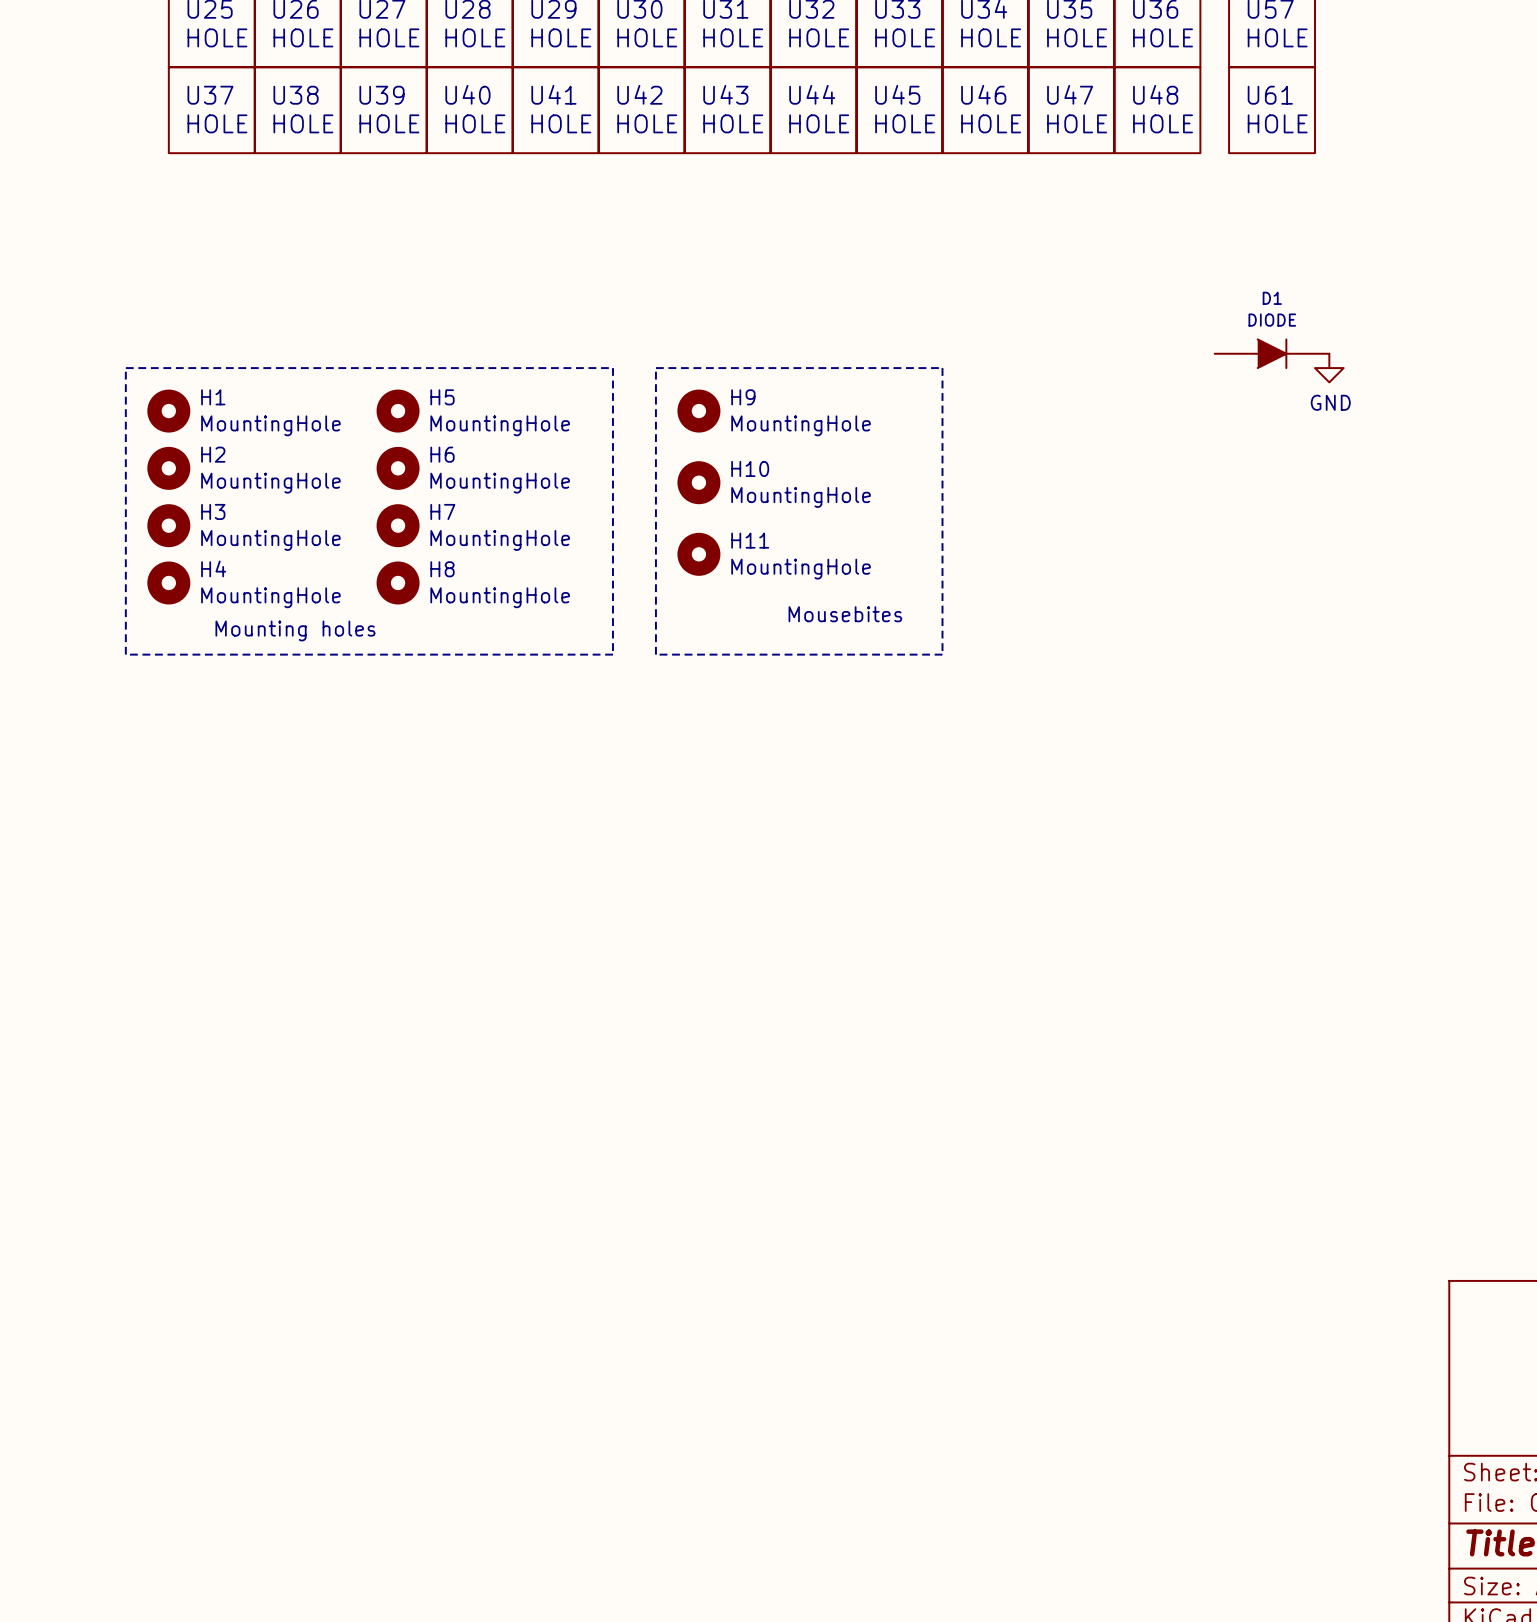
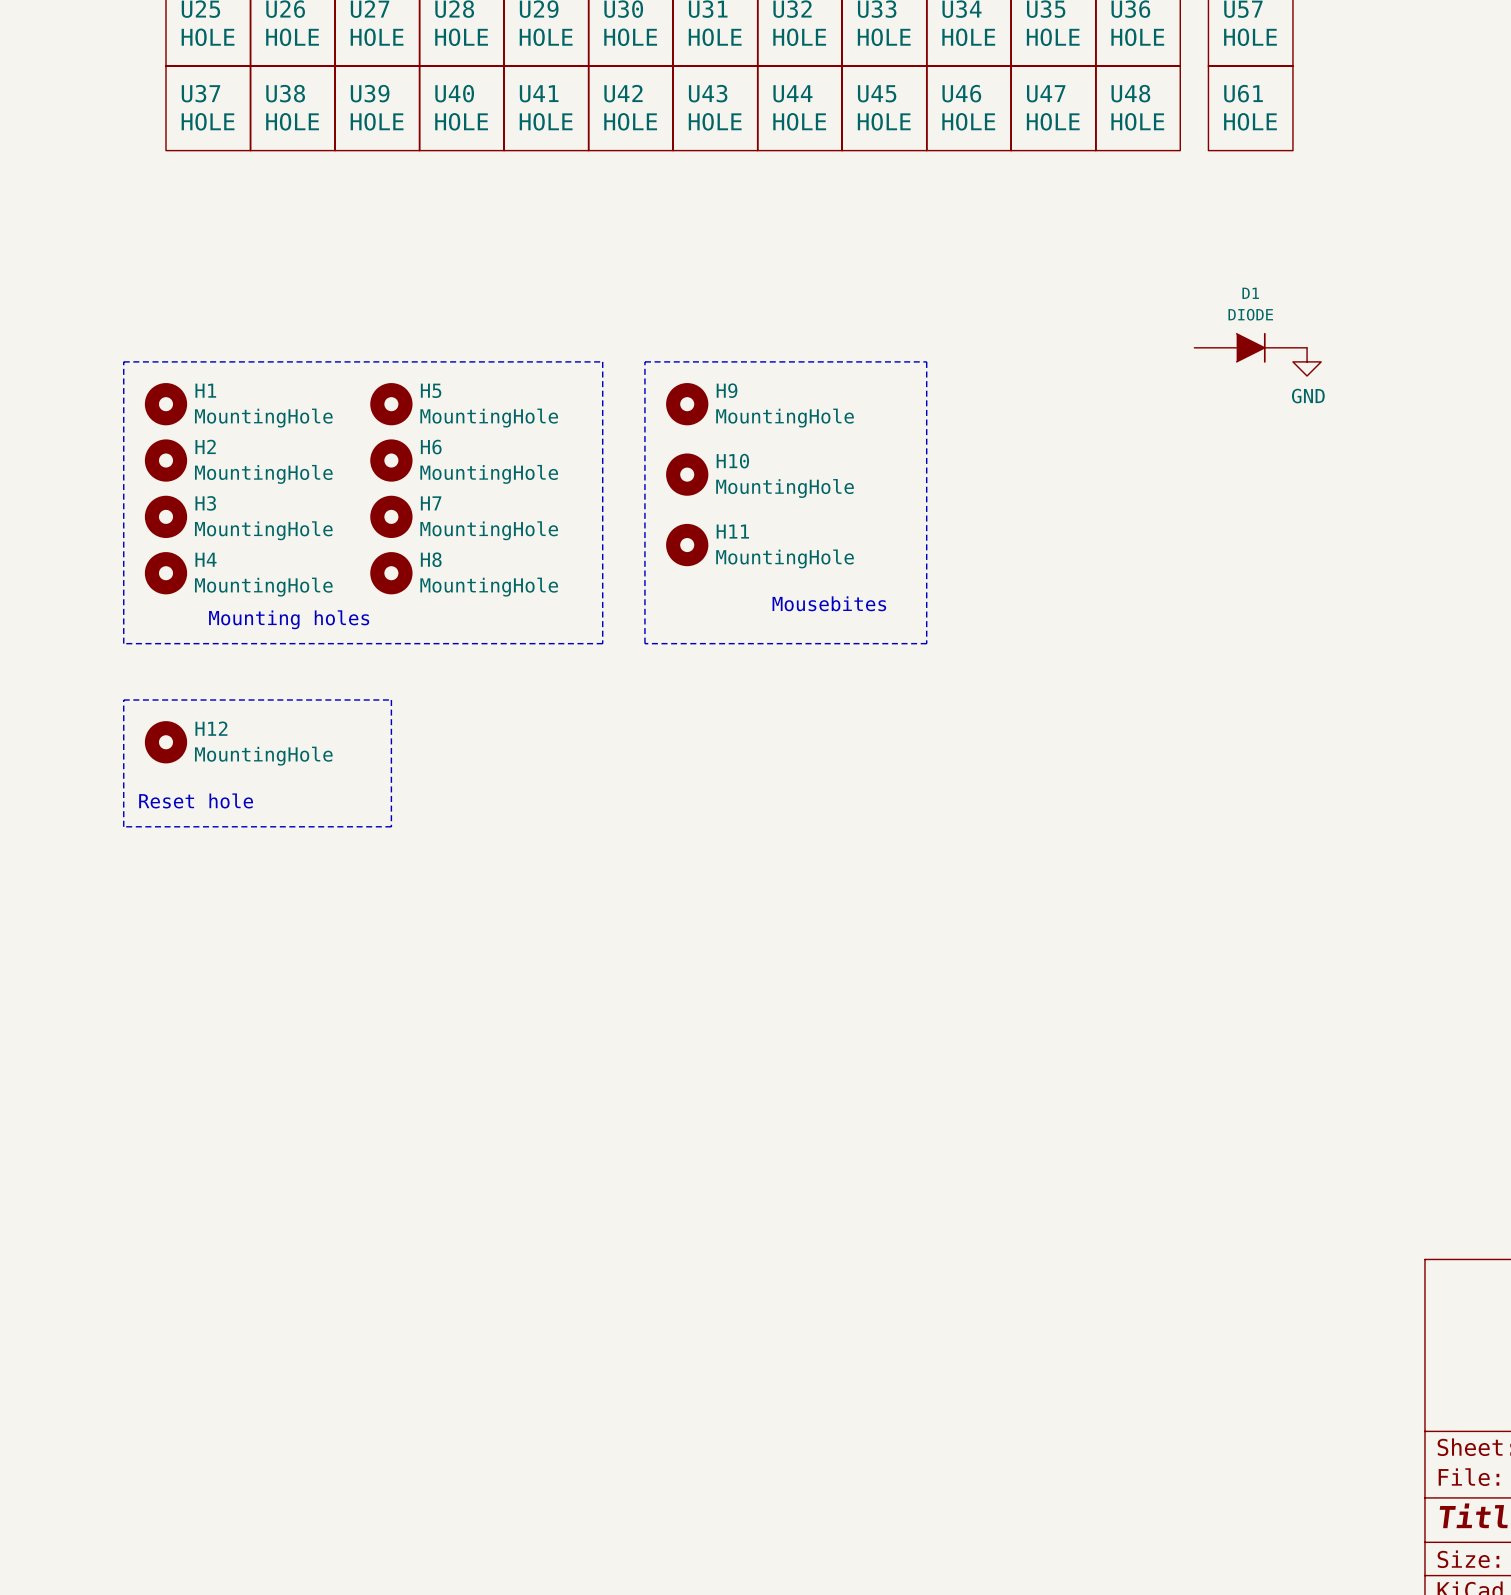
line: none -> (123, 700) (391, 700) (391, 826) (123, 826) (123, 700)
H12: none -> MountingHole (166, 742)
text: none -> Reset hole (196, 800)

